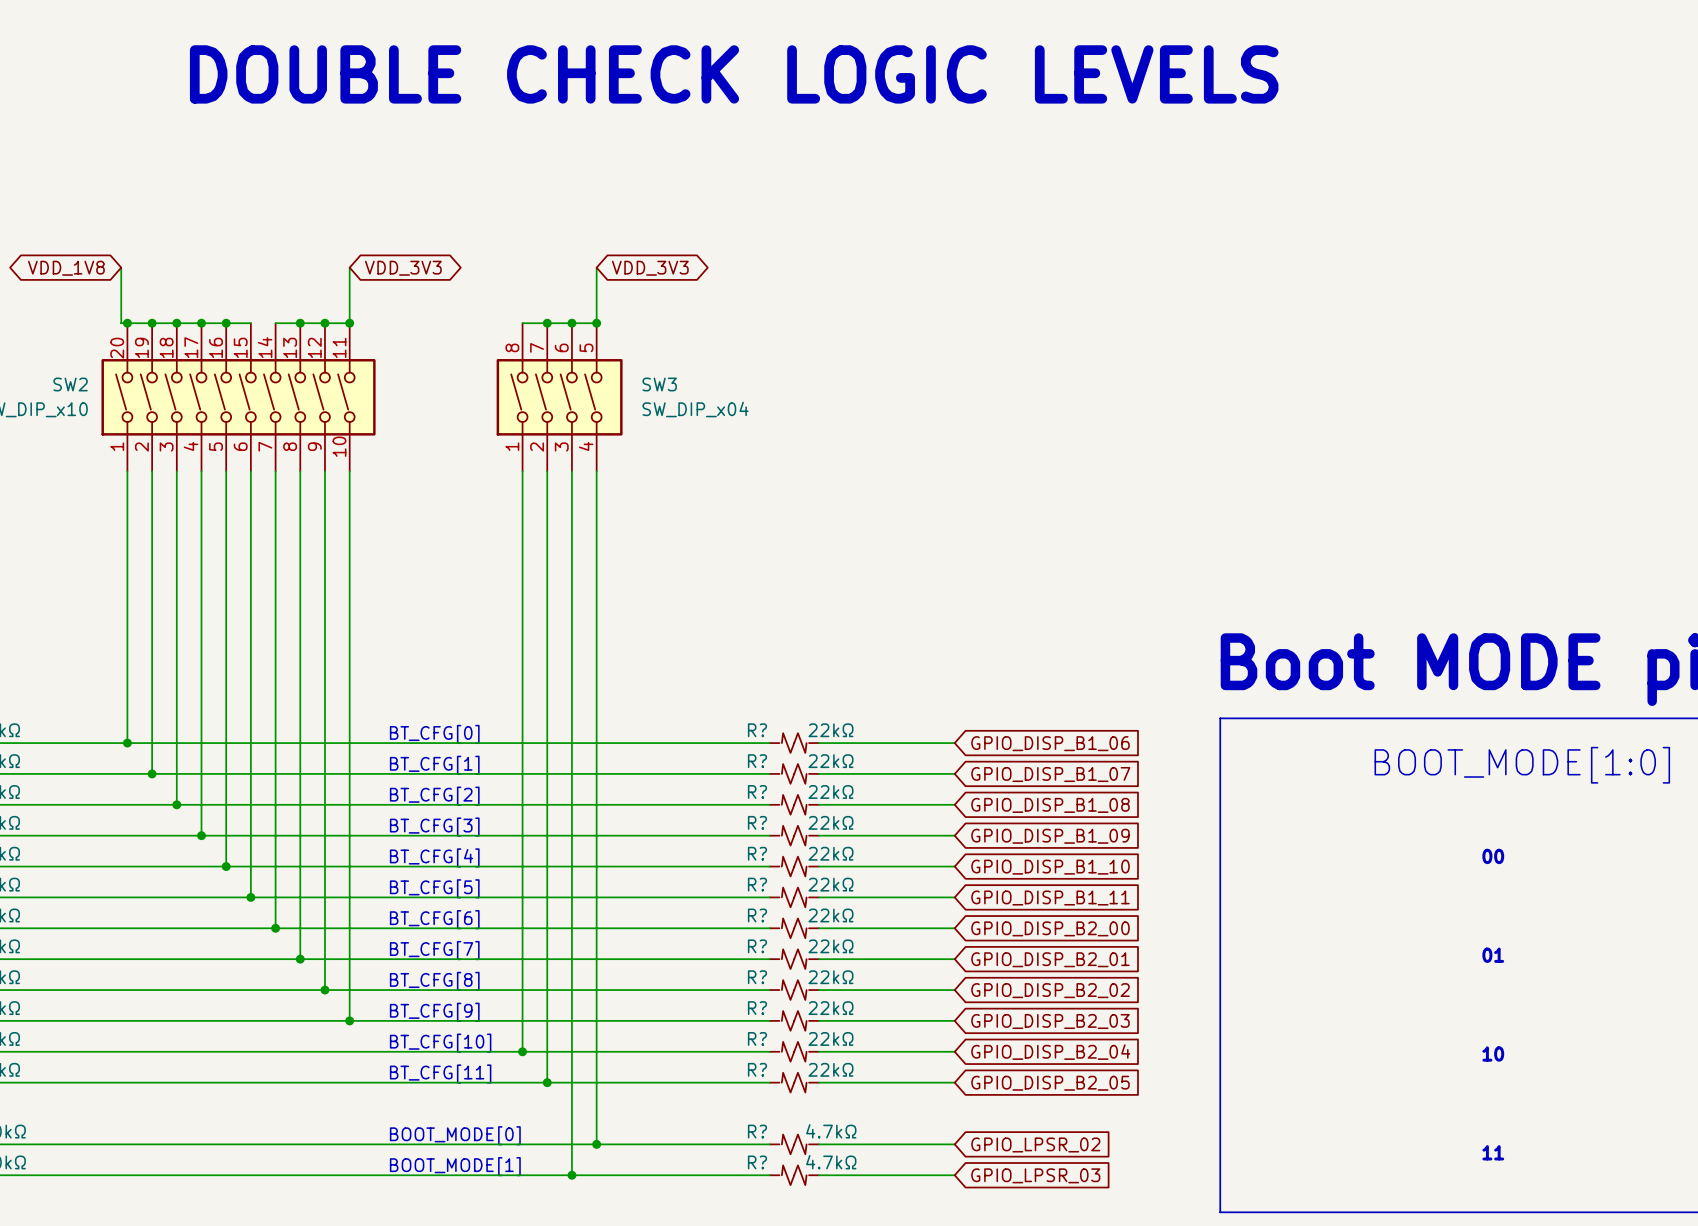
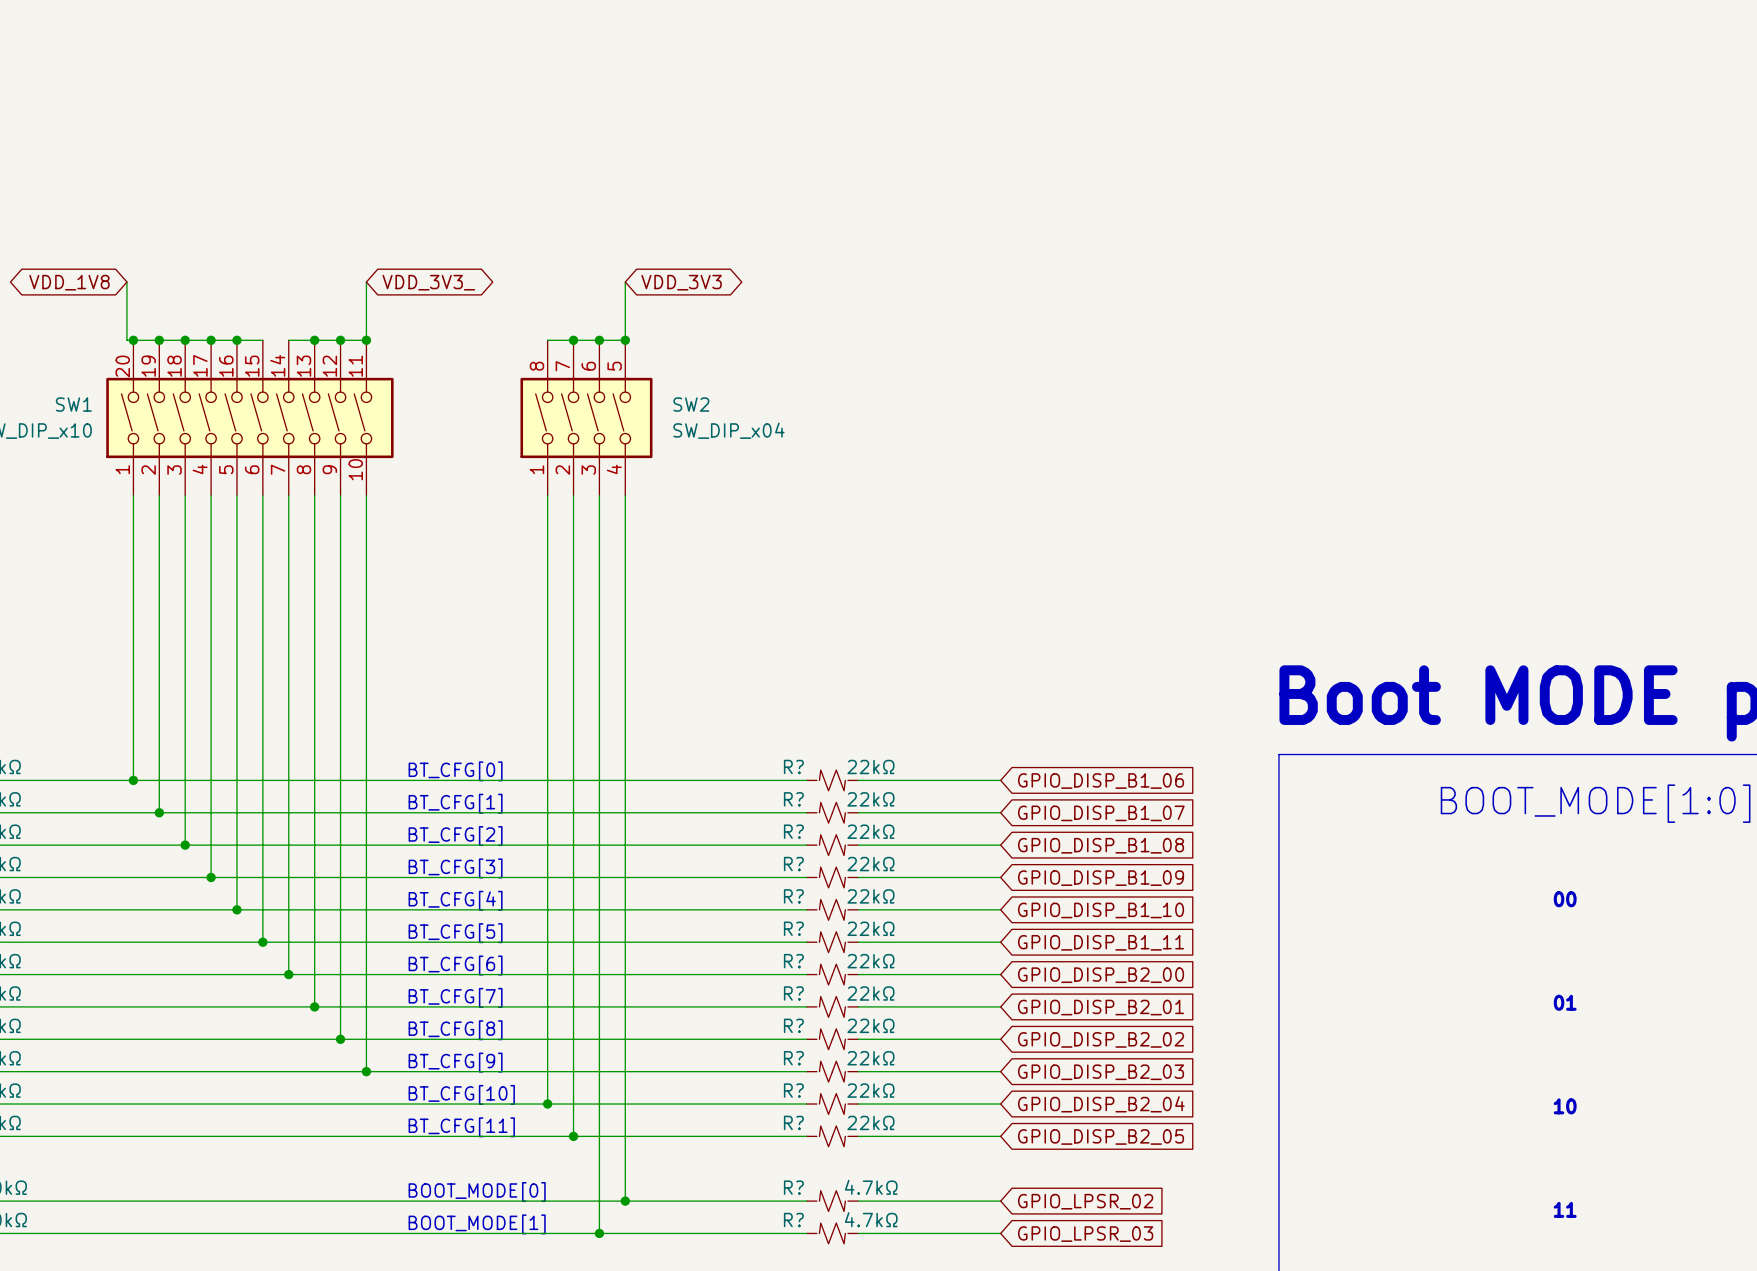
text: DOUBLE CHECK LOGIC LEVELS (734, 74) -> none
global label: VDD_3V3 (403, 268) -> VDD_3V3_ (428, 282)
SW2 name: SW2 (70, 384) -> SW1 (73, 404)
SW3 name: SW3 (659, 384) -> SW2 (691, 404)

